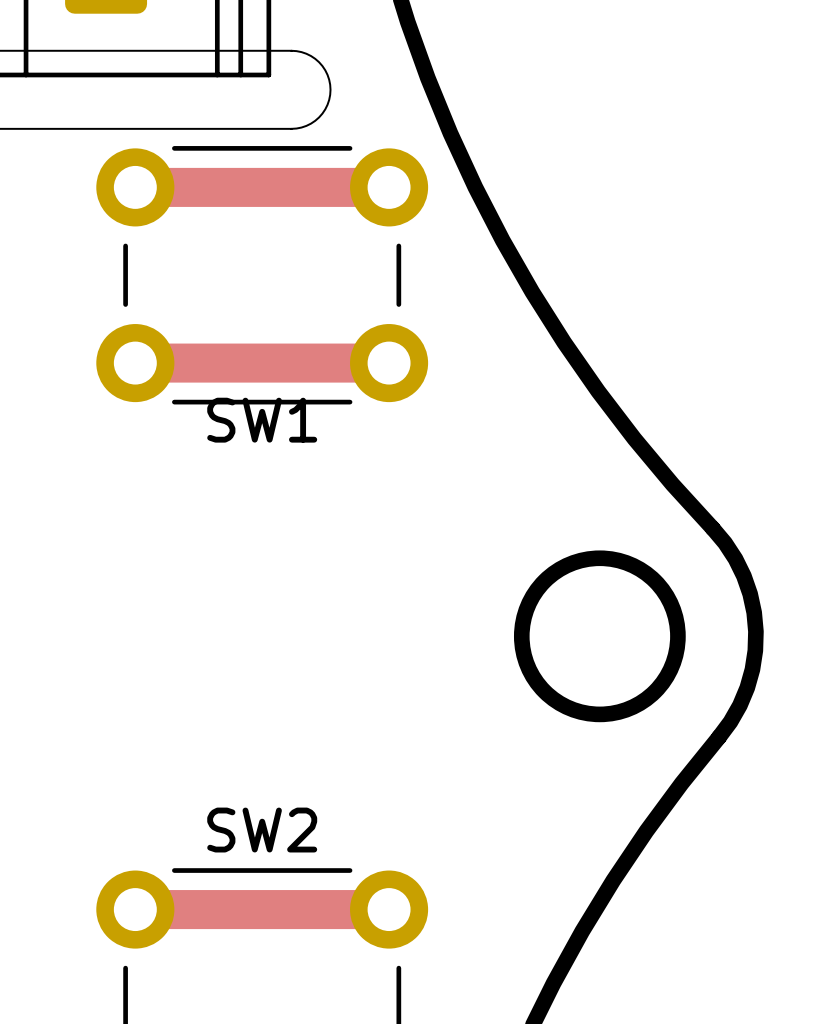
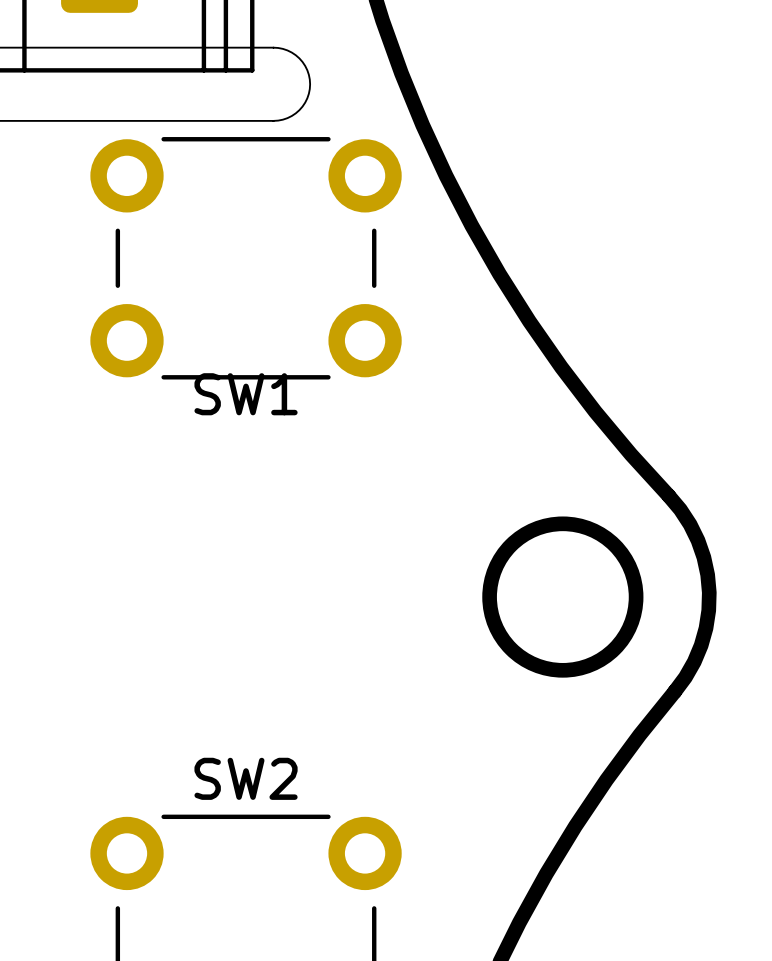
track: (135, 187) (389, 187) -> none
track: (135, 363) (389, 363) -> none
track: (135, 909) (389, 909) -> none

